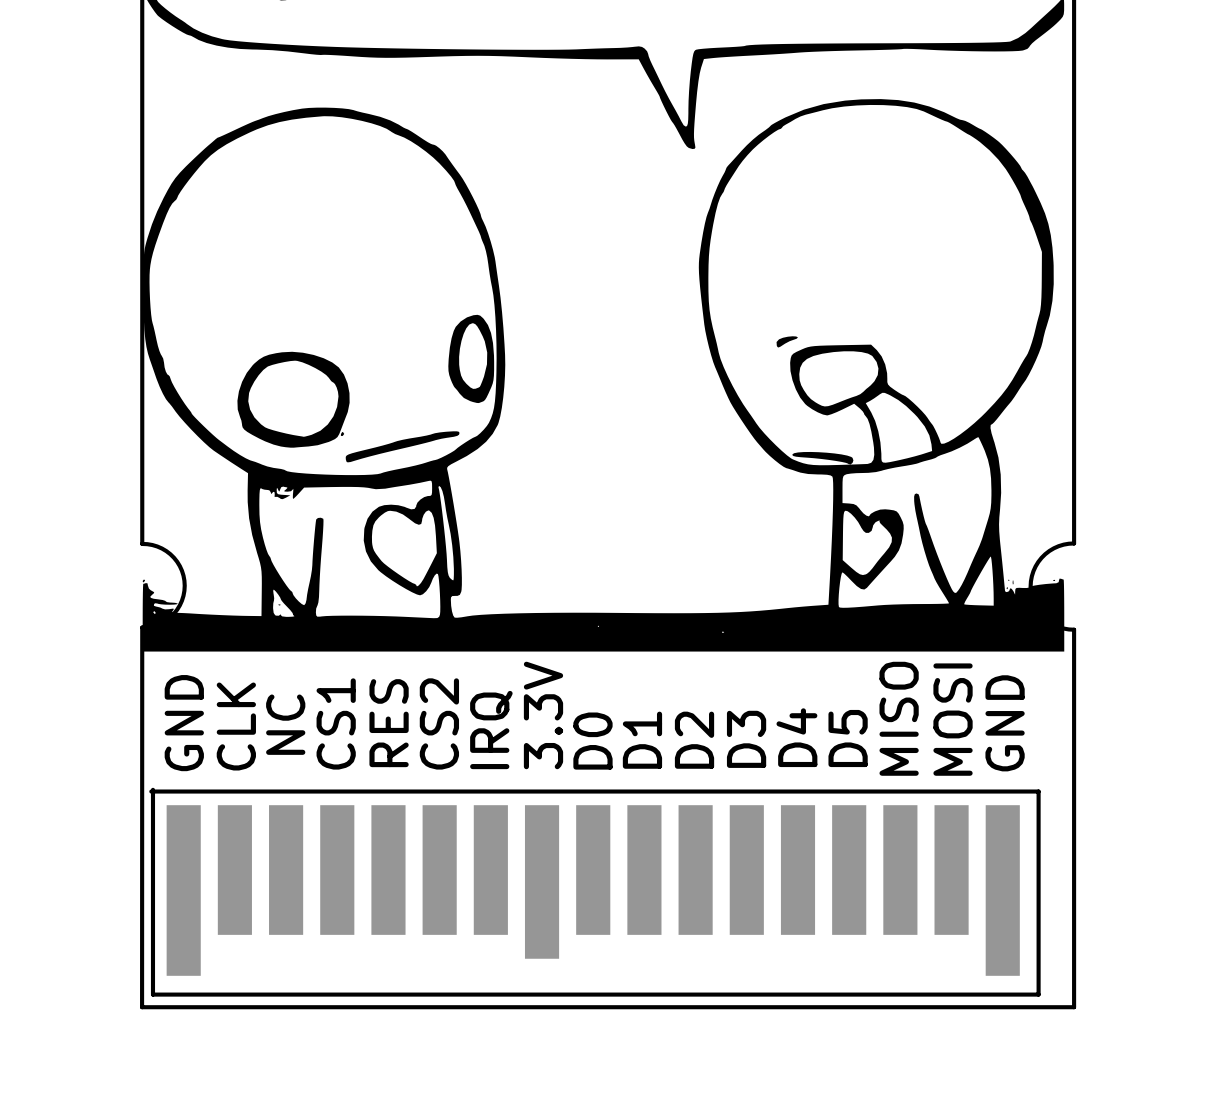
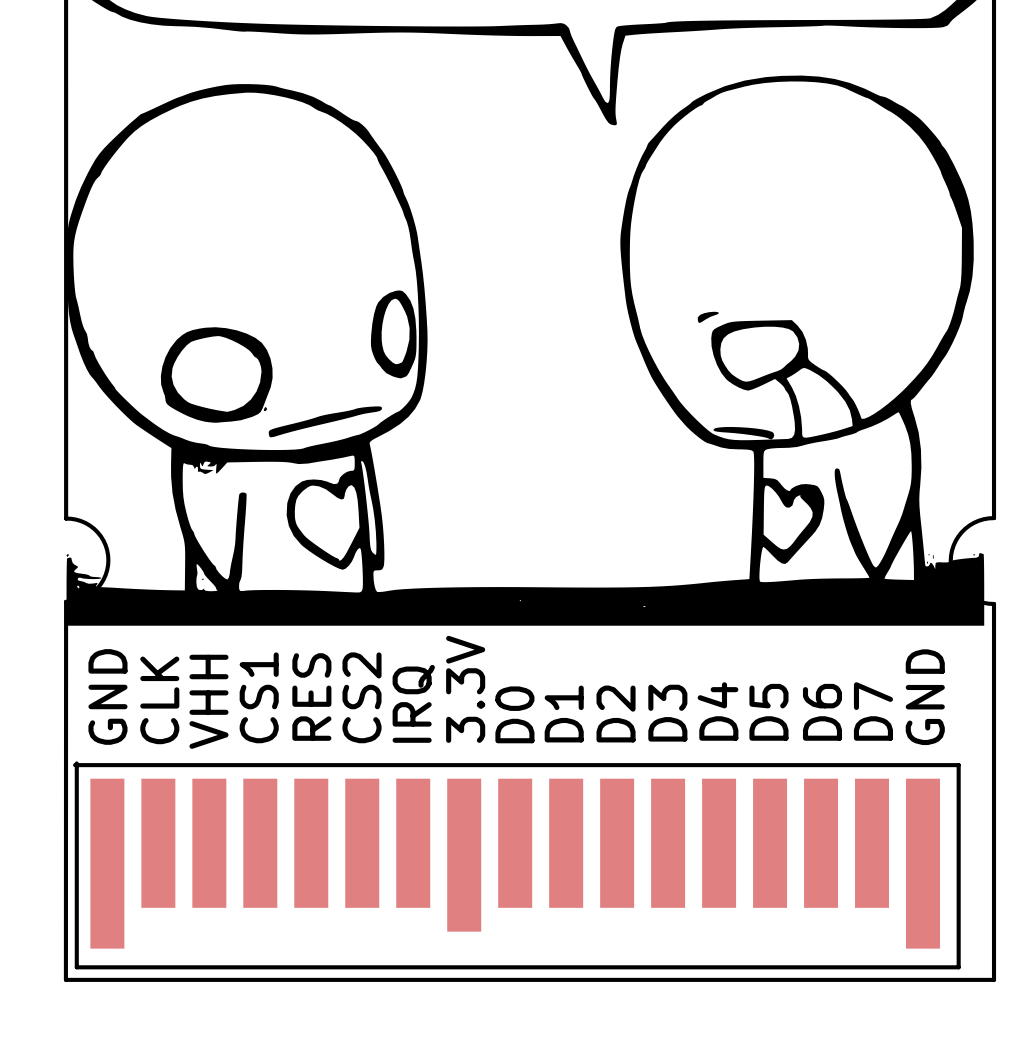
text: MISO (899, 718) -> D6 (822, 712)
text: MOSI (953, 719) -> D7 (873, 711)
text: NC (285, 724) -> VHH (208, 701)

